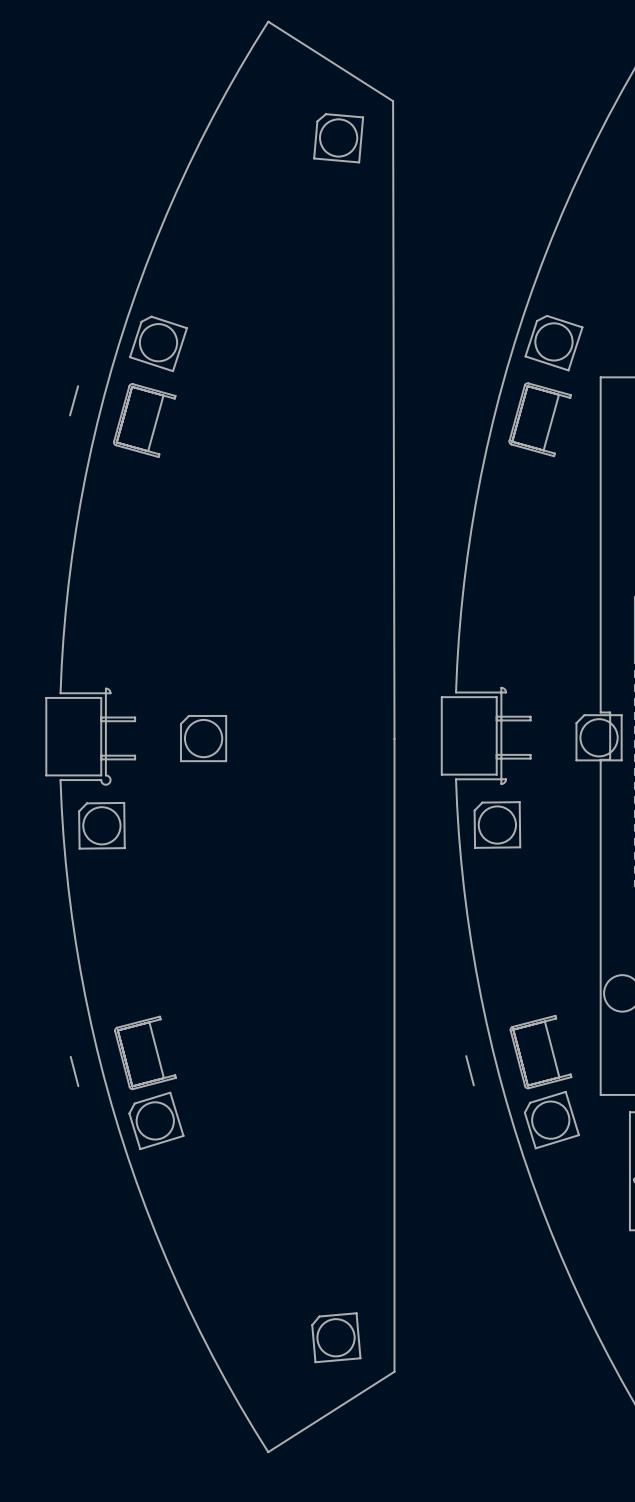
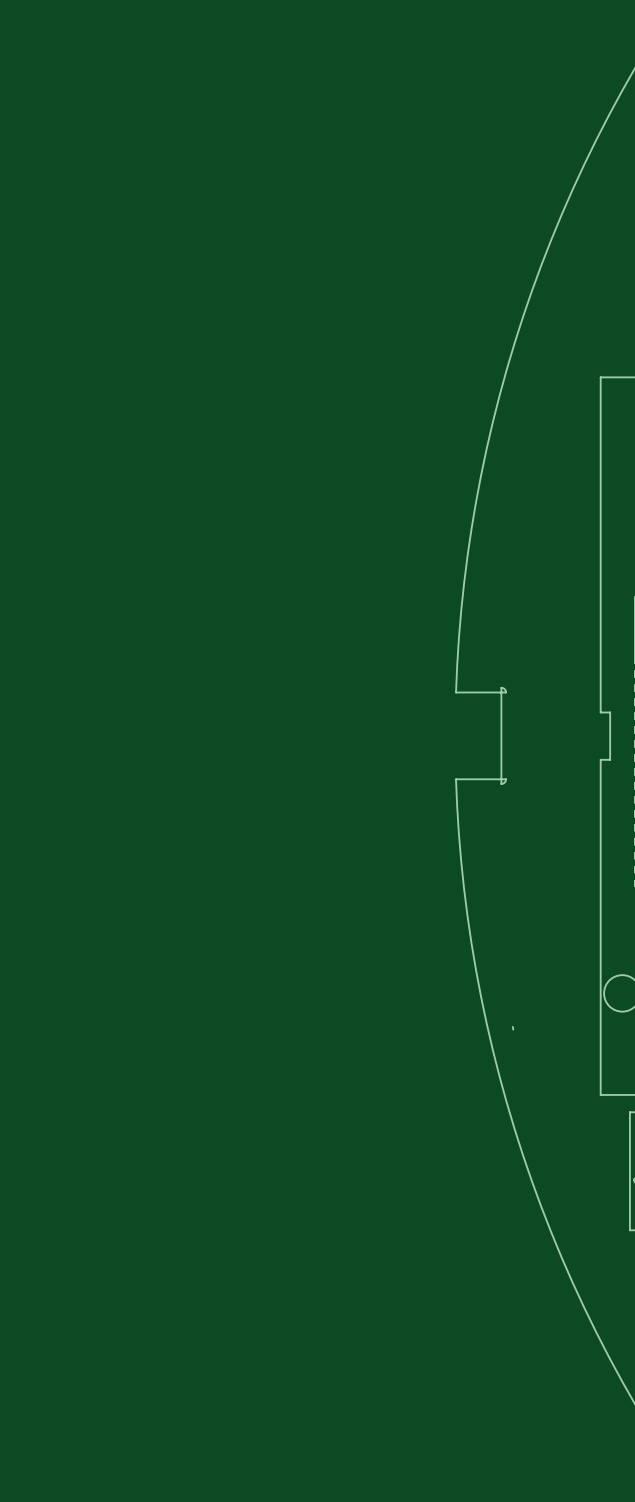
line: (268, 21) (393, 101) (394, 739) (394, 1371) (268, 1452) (226, 1381) (188, 1308) (145, 1207) (119, 1130) (91, 1024) (75, 943) (65, 862) (60, 780) (101, 780) (106, 784) (110, 780) (109, 777) (105, 775) (105, 688) (109, 690) (110, 693) (60, 693) (65, 611) (76, 529) (91, 449) (104, 396) (136, 291) (177, 190) (226, 92) (268, 21) -> none
line: (326, 114) (317, 121) (314, 158) (359, 162) (363, 117) (326, 114) -> none
drawing: [319, 118, 359, 158] -> none
line: (547, 315) (537, 321) (525, 356) (568, 370) (582, 327) (547, 315) -> none
line: (151, 316) (141, 321) (130, 357) (173, 371) (186, 328) (151, 316) -> none
drawing: [534, 322, 574, 362] -> none
drawing: [138, 323, 179, 363] -> none
line: (528, 383) (571, 395) (570, 397) (527, 386) (512, 441) (554, 453) (554, 456) (509, 442) (524, 385) (528, 383) -> none
line: (132, 384) (175, 395) (174, 398) (132, 386) (116, 442) (159, 454) (158, 457) (114, 443) (129, 386) (132, 384) -> none
line: (78, 386) (70, 415) -> none
line: (559, 394) (543, 450) -> none
line: (163, 395) (148, 451) -> none
line: (46, 697) (46, 775) (101, 775) (101, 697) (46, 697) -> none
line: (441, 697) (441, 774) (496, 774) (496, 697) (441, 697) -> none
line: (188, 715) (180, 723) (180, 761) (226, 761) (226, 715) (188, 715) -> none
line: (584, 715) (576, 723) (576, 760) (621, 760) (621, 715) (584, 715) -> none
line: (496, 716) (530, 716) (530, 720) (496, 720) -> none
line: (101, 717) (135, 717) (135, 721) (101, 721) -> none
drawing: [579, 718, 619, 758] -> none
drawing: [184, 719, 224, 759] -> none
line: (496, 754) (530, 754) (530, 758) (496, 758) -> none
line: (101, 755) (135, 755) (135, 759) (101, 759) -> none
line: (124, 802) (86, 803) (79, 811) (79, 848) (124, 848) (124, 802) -> none
line: (519, 802) (482, 802) (474, 810) (475, 847) (520, 847) (519, 802) -> none
drawing: [477, 805, 517, 845] -> none
drawing: [82, 806, 122, 846] -> none
line: (555, 1015) (510, 1028) (526, 1088) (571, 1077) (570, 1074) (527, 1085) (513, 1029) (556, 1018) (555, 1015) -> none
line: (160, 1016) (115, 1029) (131, 1088) (175, 1077) (175, 1075) (132, 1086) (117, 1030) (160, 1019) (160, 1016) -> none
line: (544, 1021) (559, 1077) -> none
line: (149, 1022) (163, 1078) -> none
line: (70, 1056) (78, 1086) -> none
line: (466, 1056) (473, 1085) -> none
line: (565, 1091) (530, 1102) (524, 1112) (535, 1148) (578, 1135) (565, 1091) -> none
line: (170, 1092) (134, 1103) (129, 1113) (140, 1149) (183, 1135) (170, 1092) -> none
drawing: [531, 1100, 571, 1140] -> none
drawing: [135, 1101, 175, 1141] -> none
line: (356, 1313) (319, 1316) (312, 1325) (315, 1362) (360, 1358) (356, 1313) -> none
drawing: [316, 1318, 356, 1358] -> none

